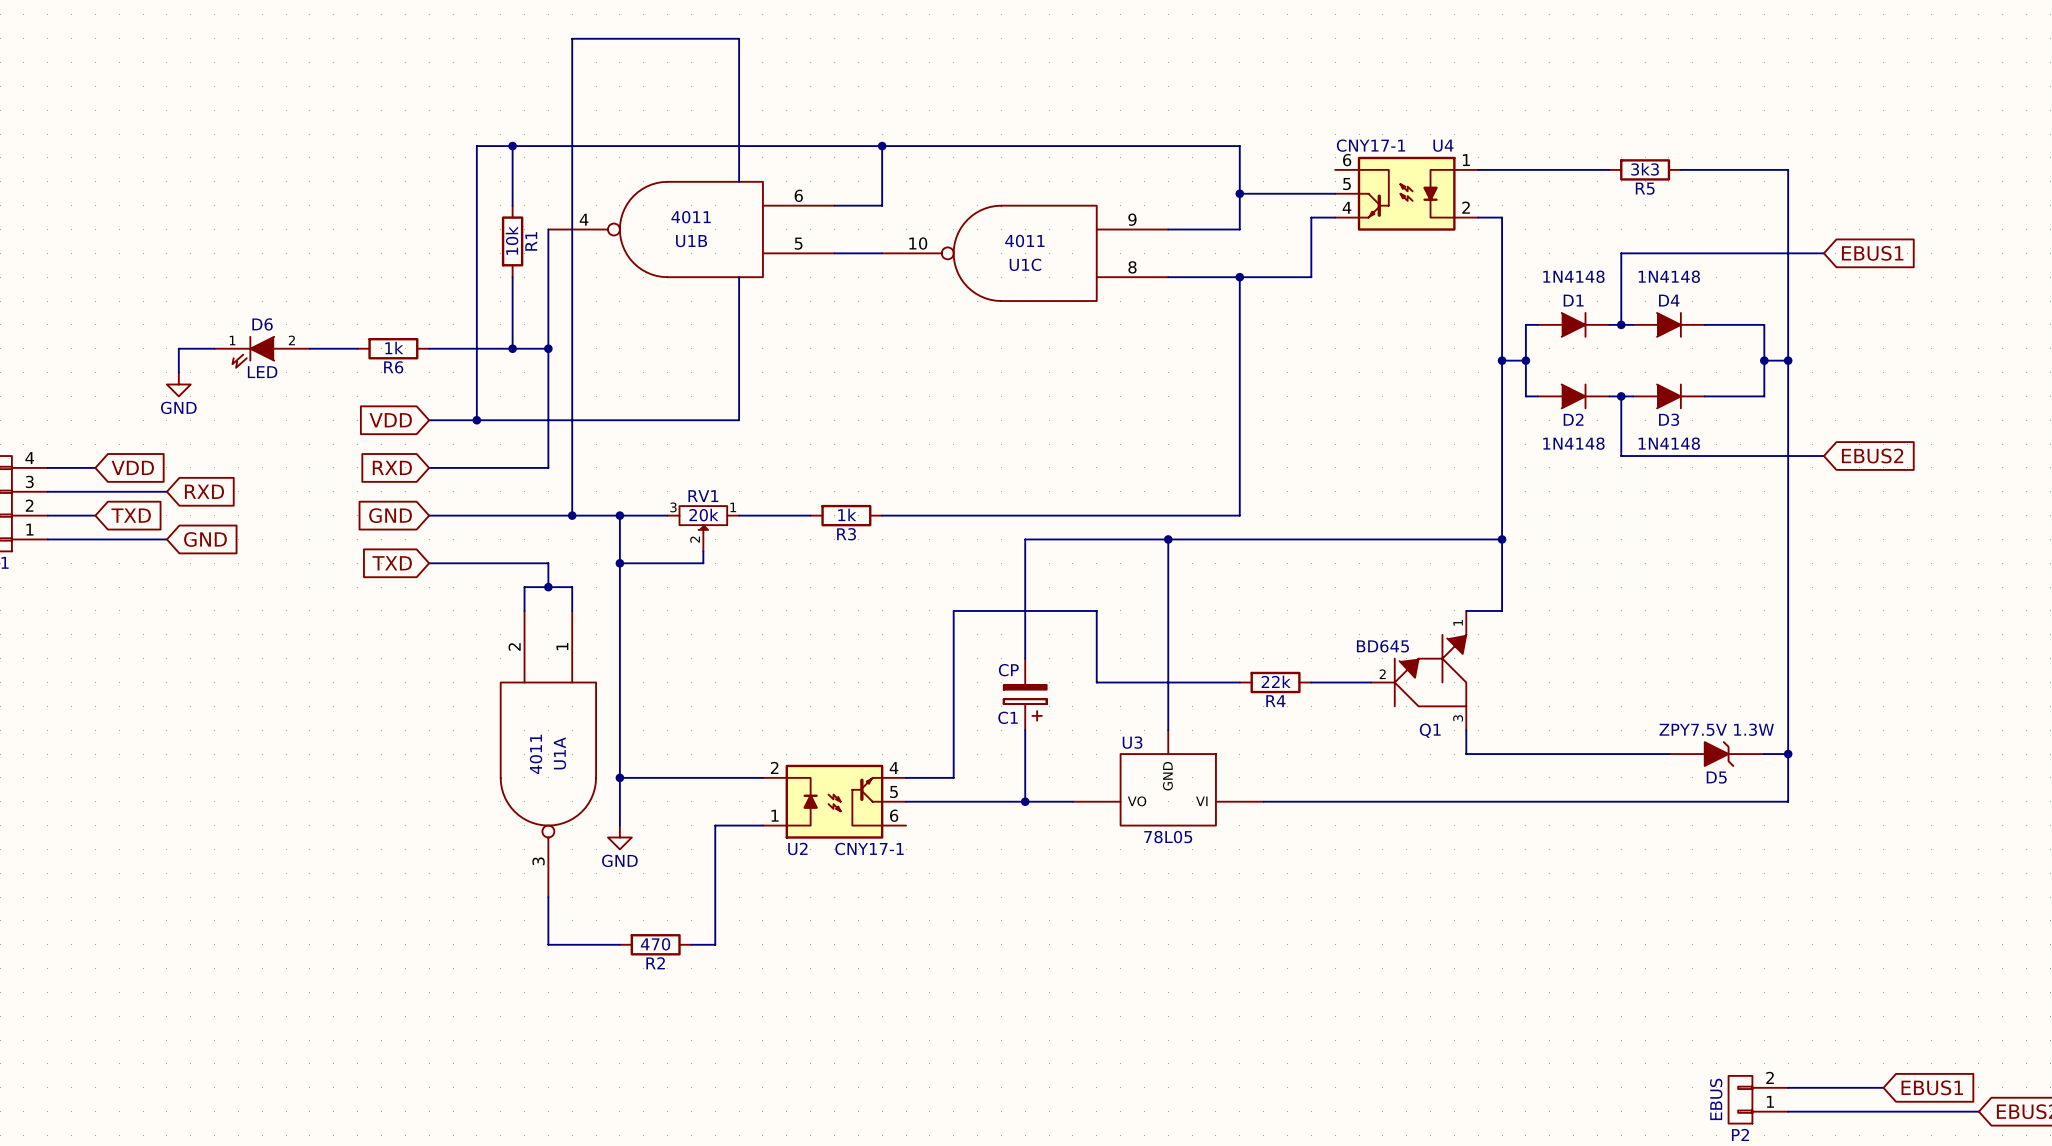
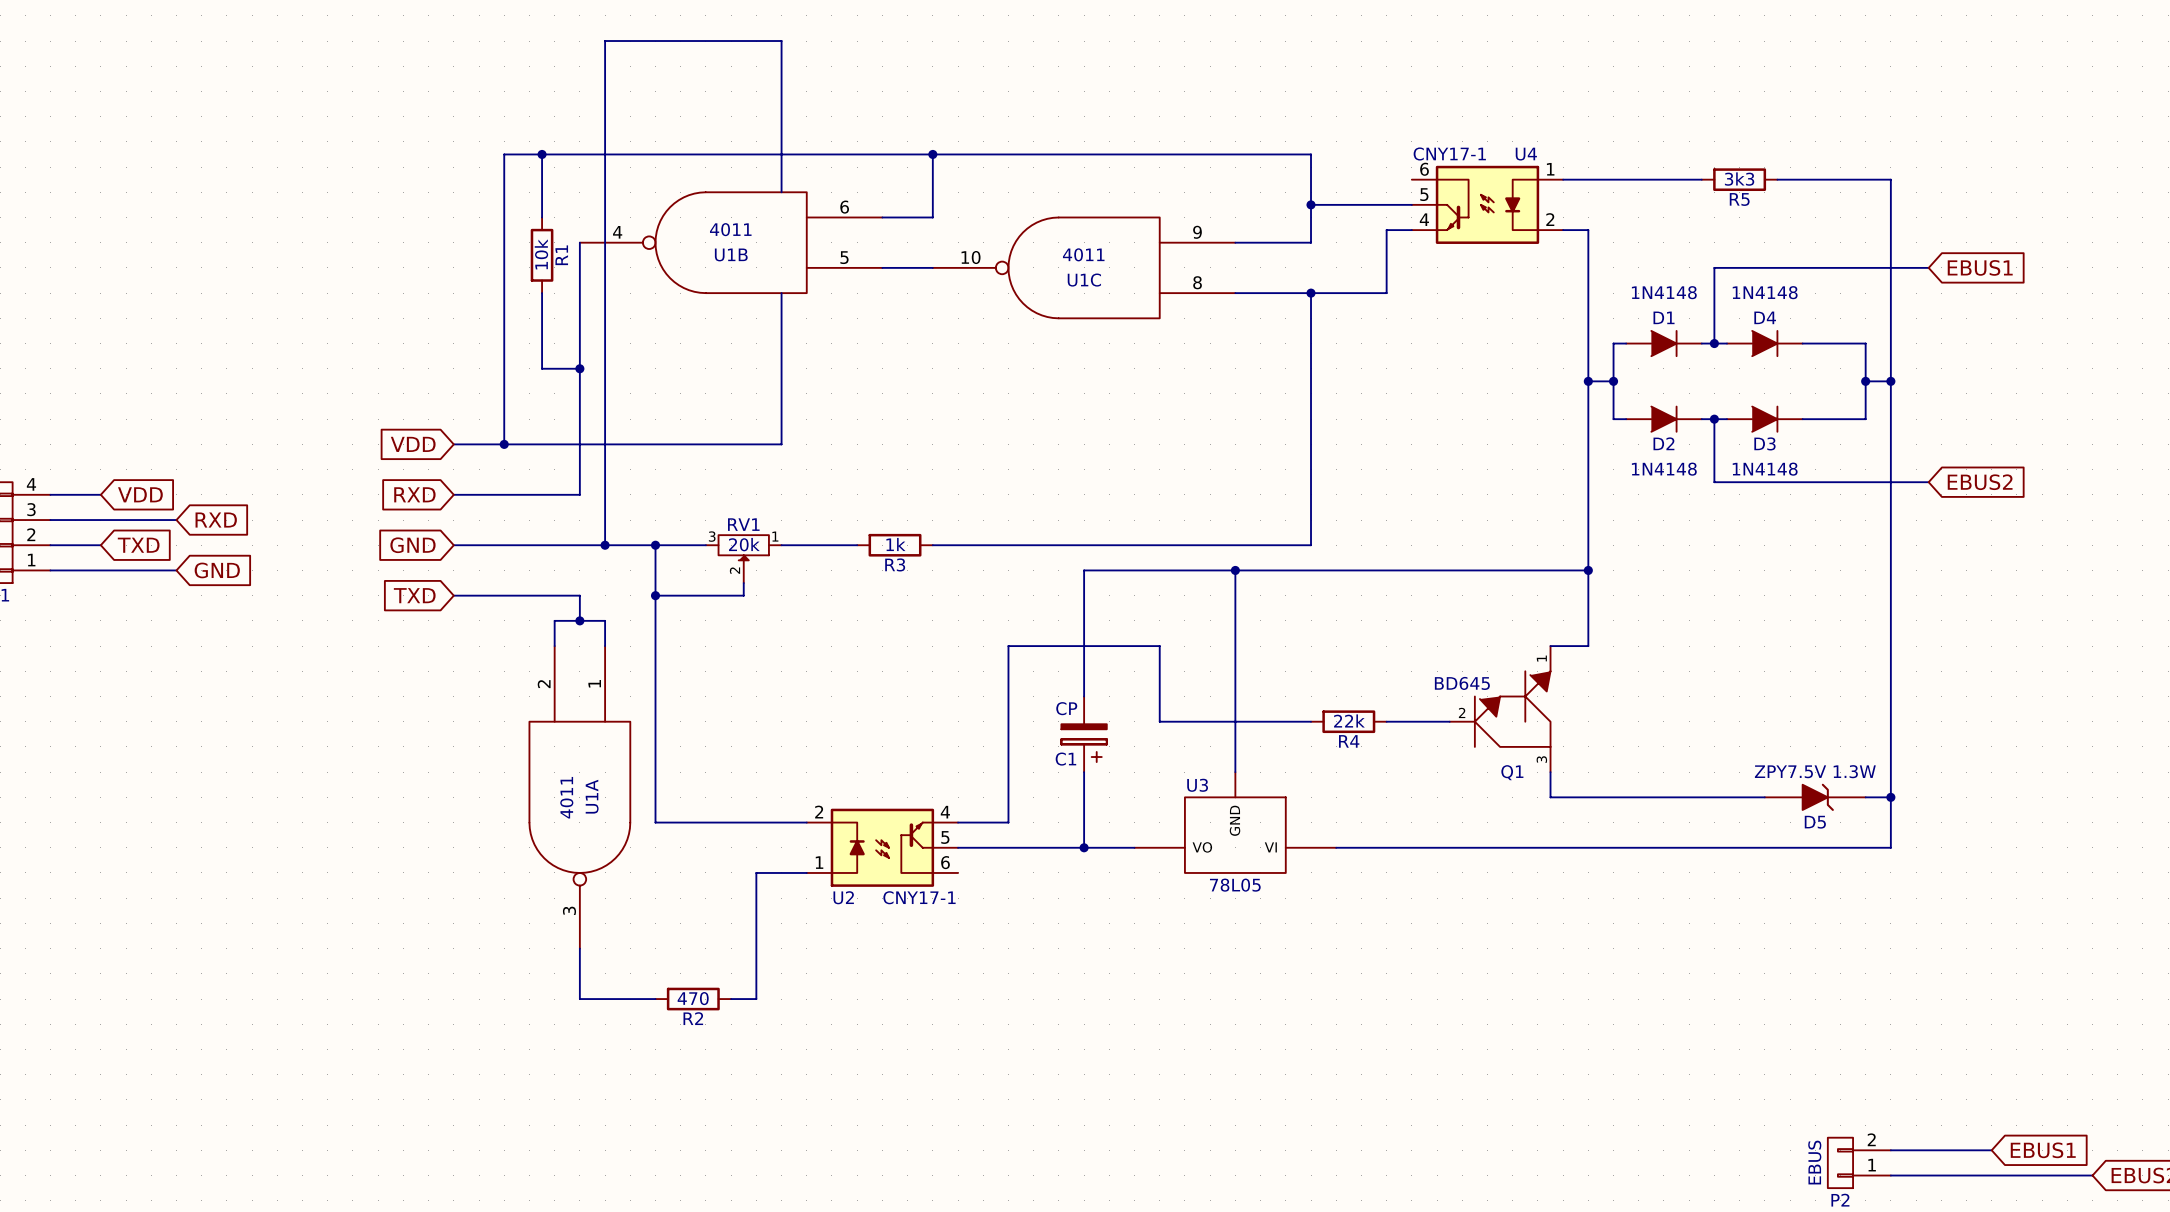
wire: (214, 348) (178, 348) (178, 372) -> none
wire: (309, 348) (357, 348) -> none
R6: 1k (393, 348) -> none
wire: (429, 348) (512, 348) -> none
junction: (512, 348) -> none
D6: LED (262, 352) -> none
power symbol: GND (178, 384) -> none
wire: (619, 777) (619, 825) -> none
junction: (619, 777) -> none
power symbol: GND (619, 837) -> none

